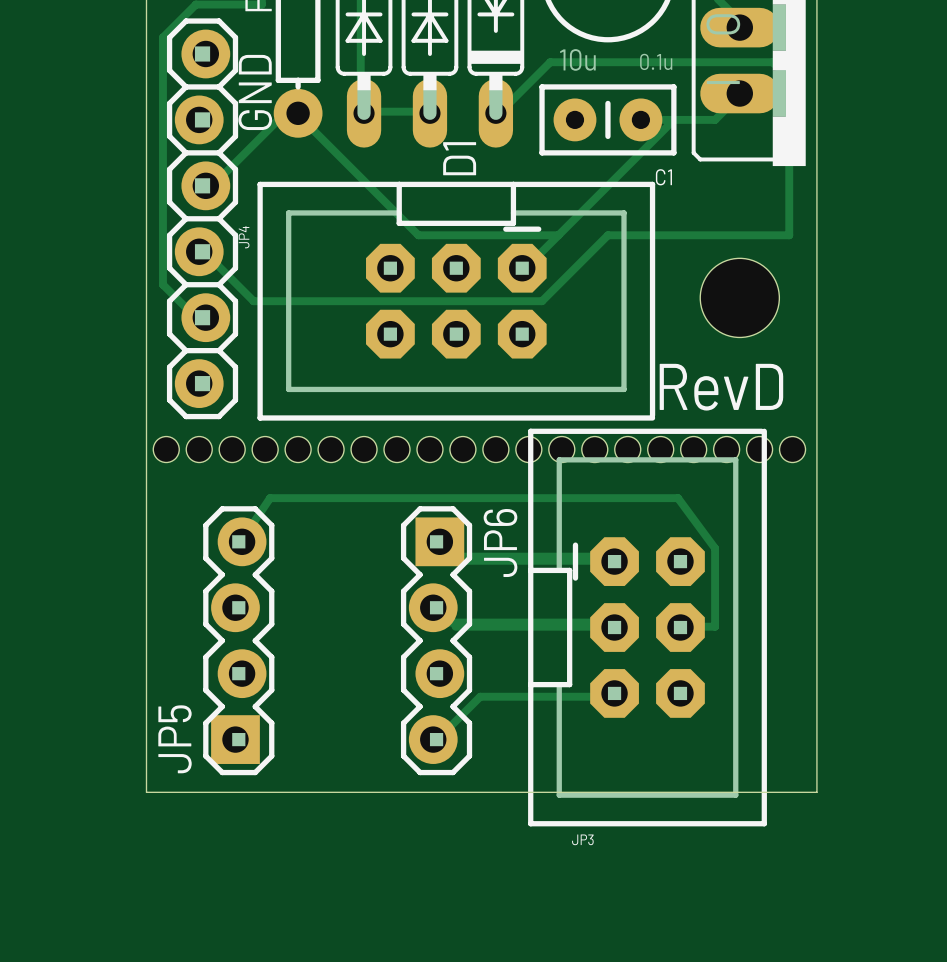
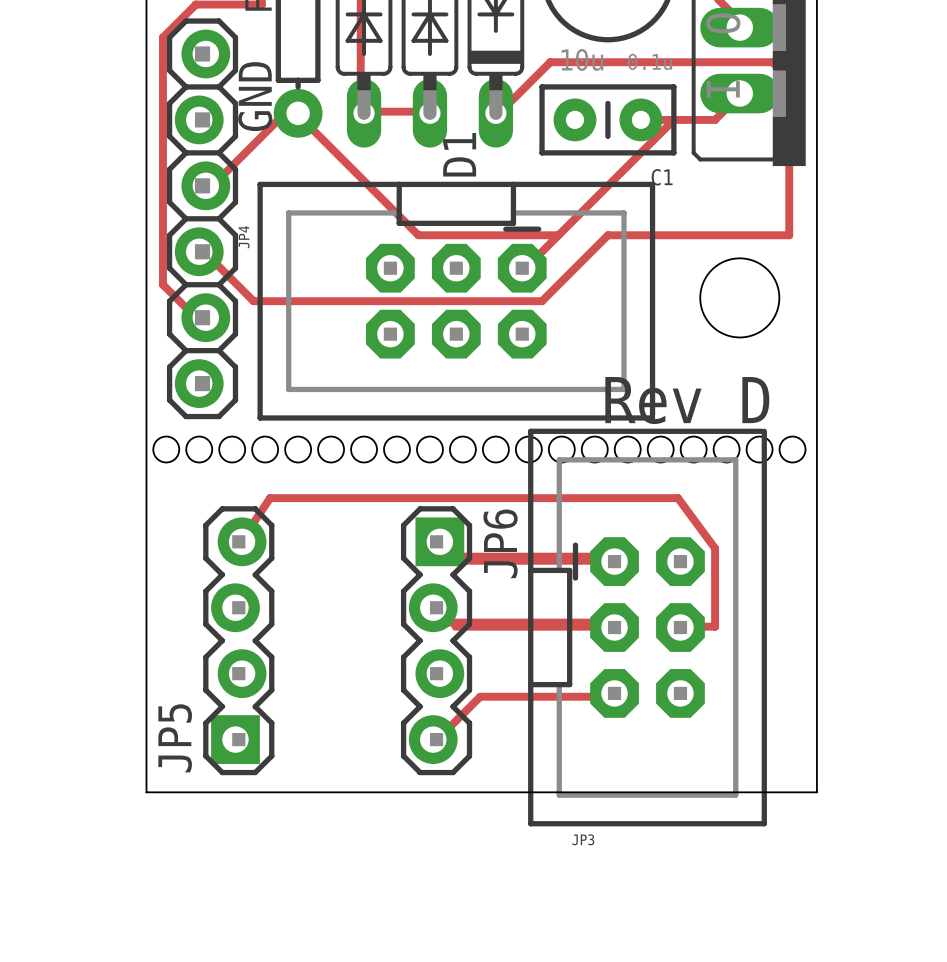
text: RevD (721, 387) -> Rev D (687, 400)

